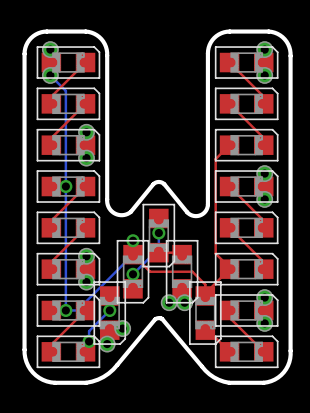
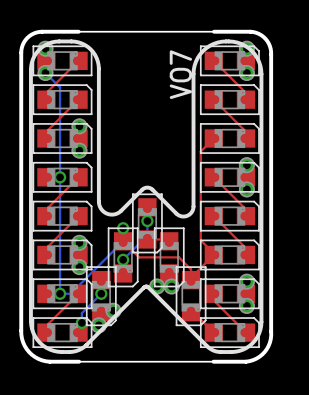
board edge: (85, 31) (94, 33) (101, 39) (107, 52) (107, 201) (109, 208) (116, 214) (127, 213) (153, 184) (159, 182) (164, 184) (188, 213) (195, 216) (204, 212) (207, 204) (208, 50) (210, 42) (216, 36) (229, 31) -> (78, 31) (214, 31)
line: none -> (59, 41) (75, 41) (85, 45) (93, 52) (97, 61) (98, 203) (102, 210) (110, 214) (119, 211) (142, 189) (147, 187) (152, 189) (178, 215) (184, 216) (190, 213) (193, 206) (193, 74) (195, 61) (206, 48) (217, 42) (226, 41) (245, 45) (257, 57) (261, 74) (261, 322) (257, 337) (246, 347) (231, 352) (211, 349) (146, 286) (86, 344) (78, 350) (69, 352) (53, 350) (43, 345) (35, 336) (30, 320) (31, 66) (39, 49) (48, 43) (59, 41)
VO7 name: none -> VO7 (180, 74)
board edge: (86, 382) (98, 379) (113, 369) (155, 319) (159, 318) (205, 370) (213, 377) (229, 382) -> (79, 361) (213, 361)

